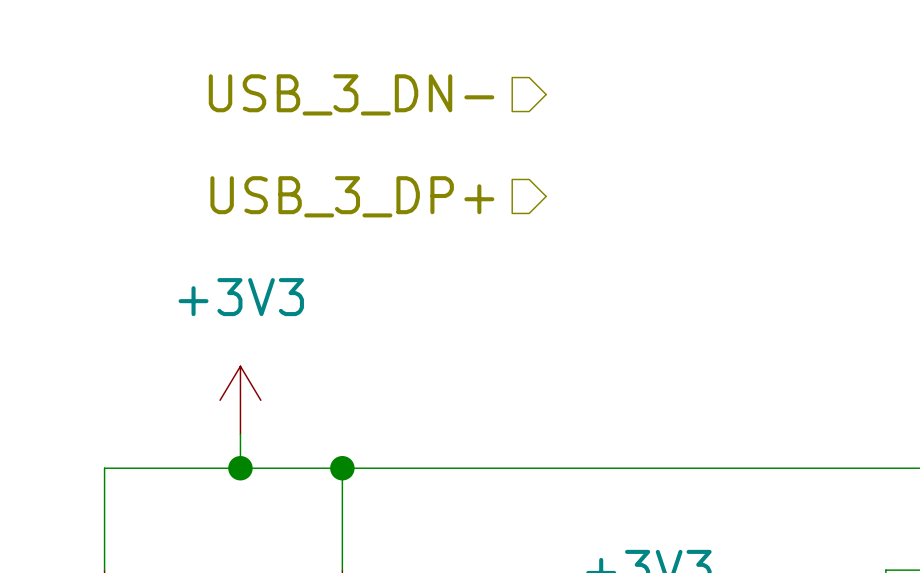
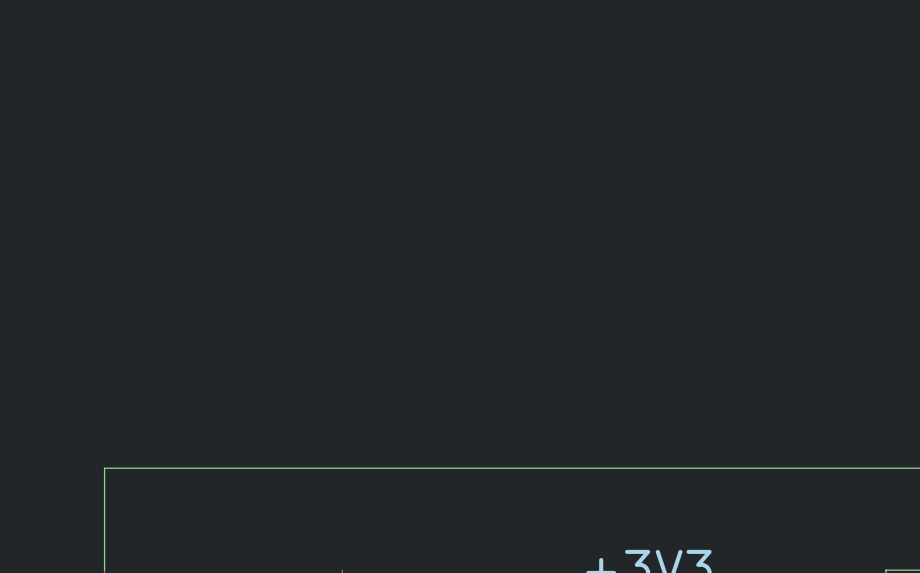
hierarchical label: USB_3_DN- (351, 94) -> none
hierarchical label: USB_3_DP+ (352, 196) -> none
power symbol: +3V3 (240, 400) -> none
wire: (240, 434) (240, 468) -> none
junction: (240, 468) -> none
wire: (342, 468) (342, 570) -> none
junction: (342, 468) -> none

